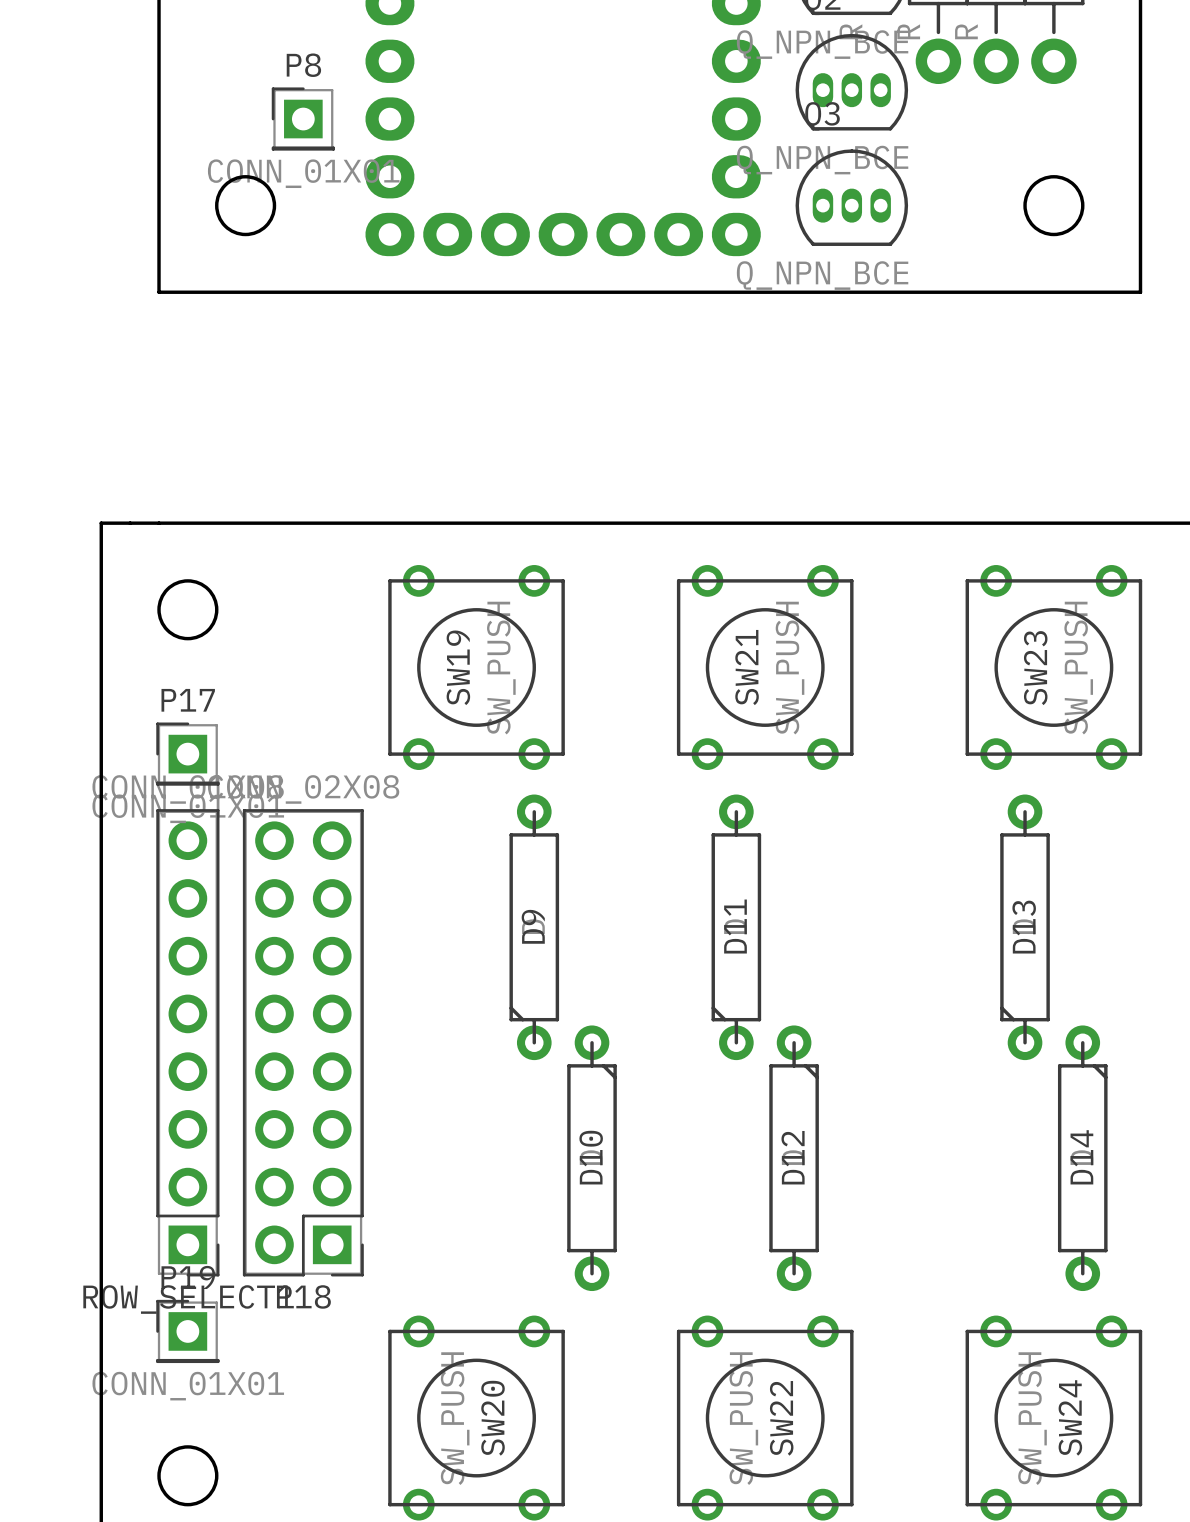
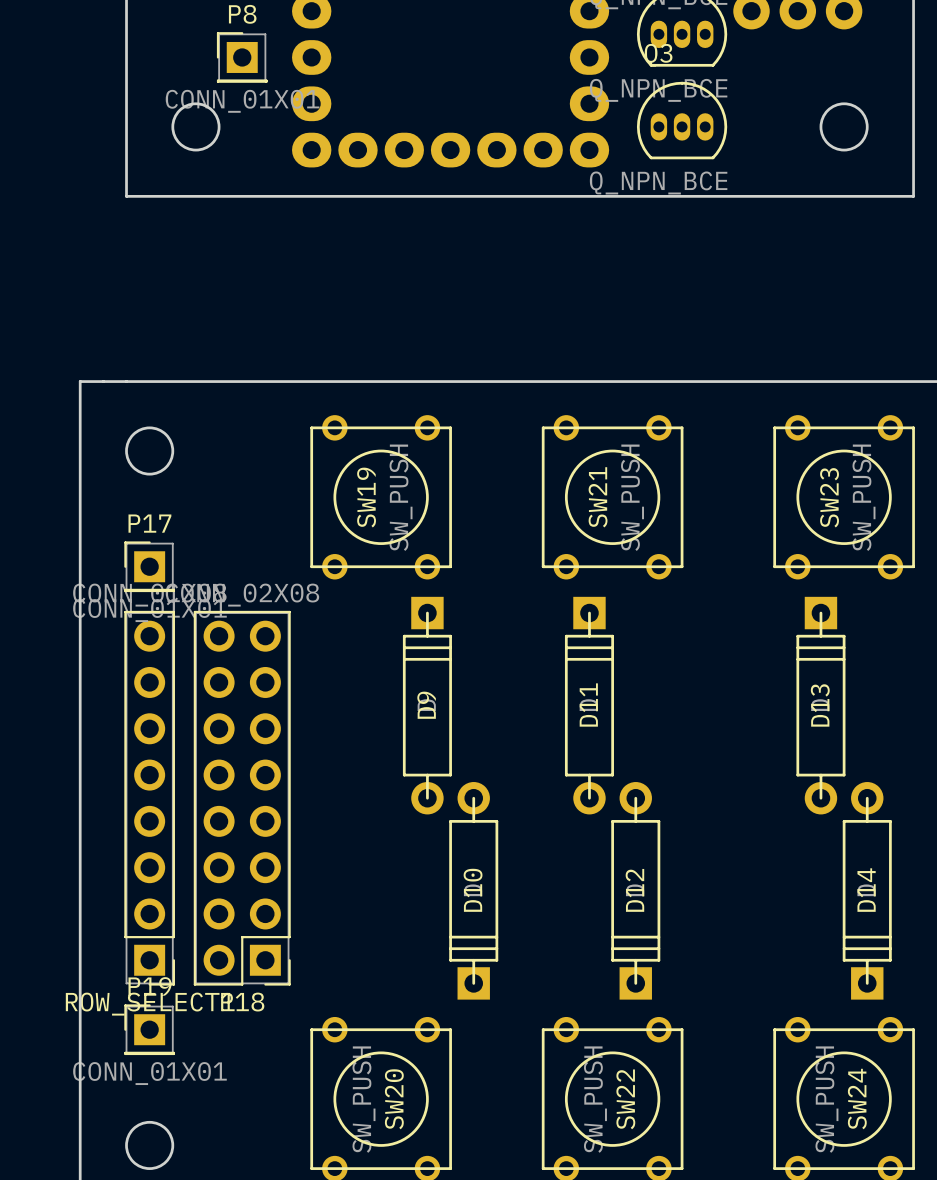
D9 footprint: [509, 794, 560, 1061] -> [402, 596, 452, 815]
D11 footprint: [711, 794, 762, 1061] -> [564, 596, 614, 815]
D13 footprint: [1000, 794, 1050, 1061] -> [796, 596, 846, 815]
D10 footprint: [567, 1025, 617, 1292] -> [449, 782, 499, 1000]
D12 footprint: [769, 1025, 819, 1292] -> [611, 782, 661, 1000]
D14 footprint: [1057, 1025, 1108, 1292] -> [842, 782, 892, 1000]

